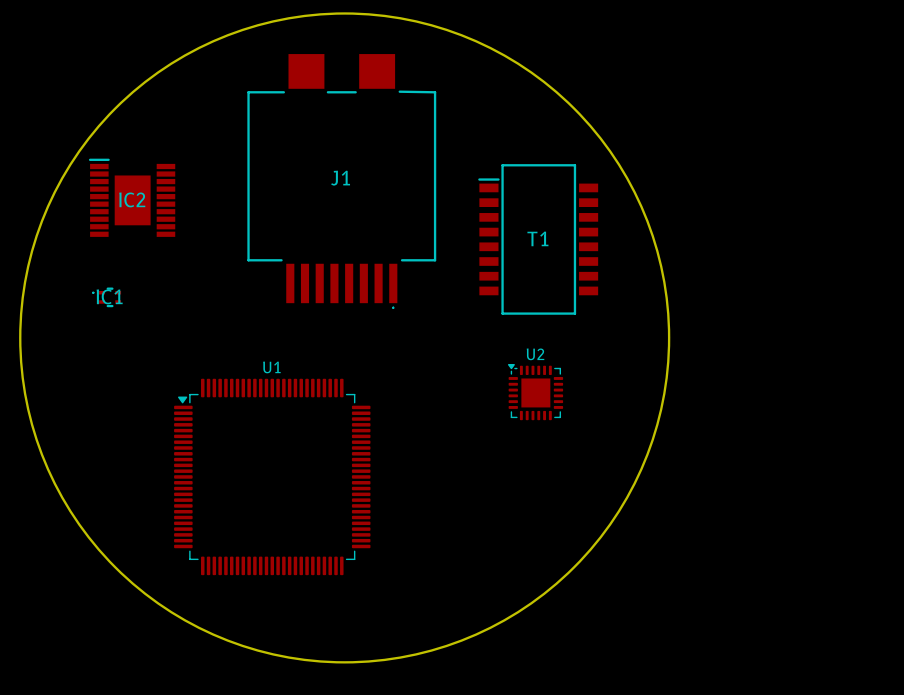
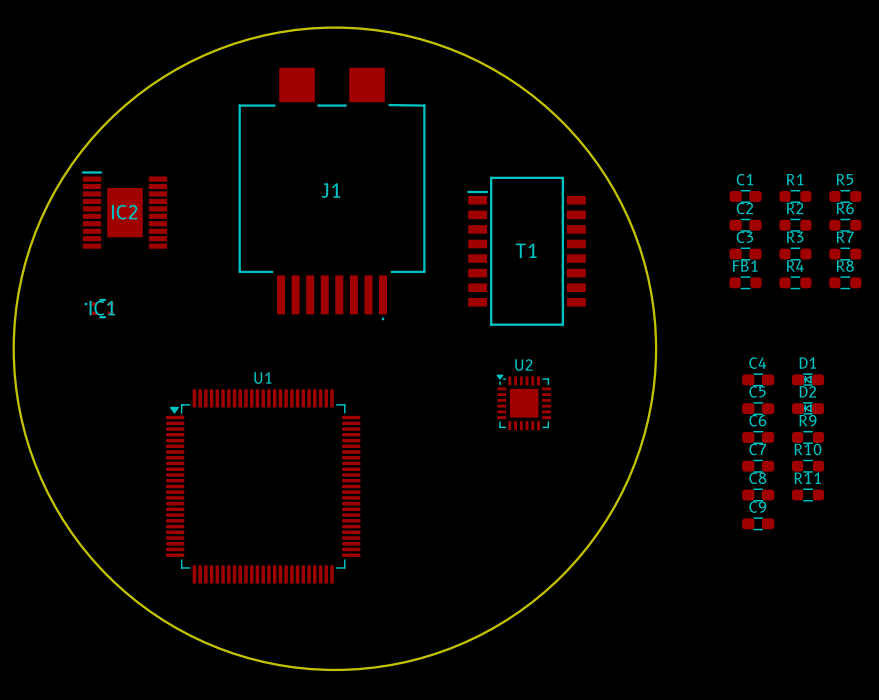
C1: none -> (745, 196)
R1: none -> (795, 196)
R5: none -> (845, 196)
C2: none -> (745, 225)
R2: none -> (795, 225)
R6: none -> (845, 225)
C3: none -> (745, 254)
R3: none -> (795, 254)
R7: none -> (845, 254)
FB1: none -> (745, 282)
R4: none -> (795, 282)
R8: none -> (845, 282)
C4: none -> (758, 379)
D1: none -> (808, 379)
C5: none -> (758, 408)
D2: none -> (808, 408)
C6: none -> (758, 437)
R9: none -> (808, 437)
C7: none -> (758, 466)
R10: none -> (808, 466)
C8: none -> (758, 495)
R11: none -> (808, 495)
C9: none -> (758, 523)

